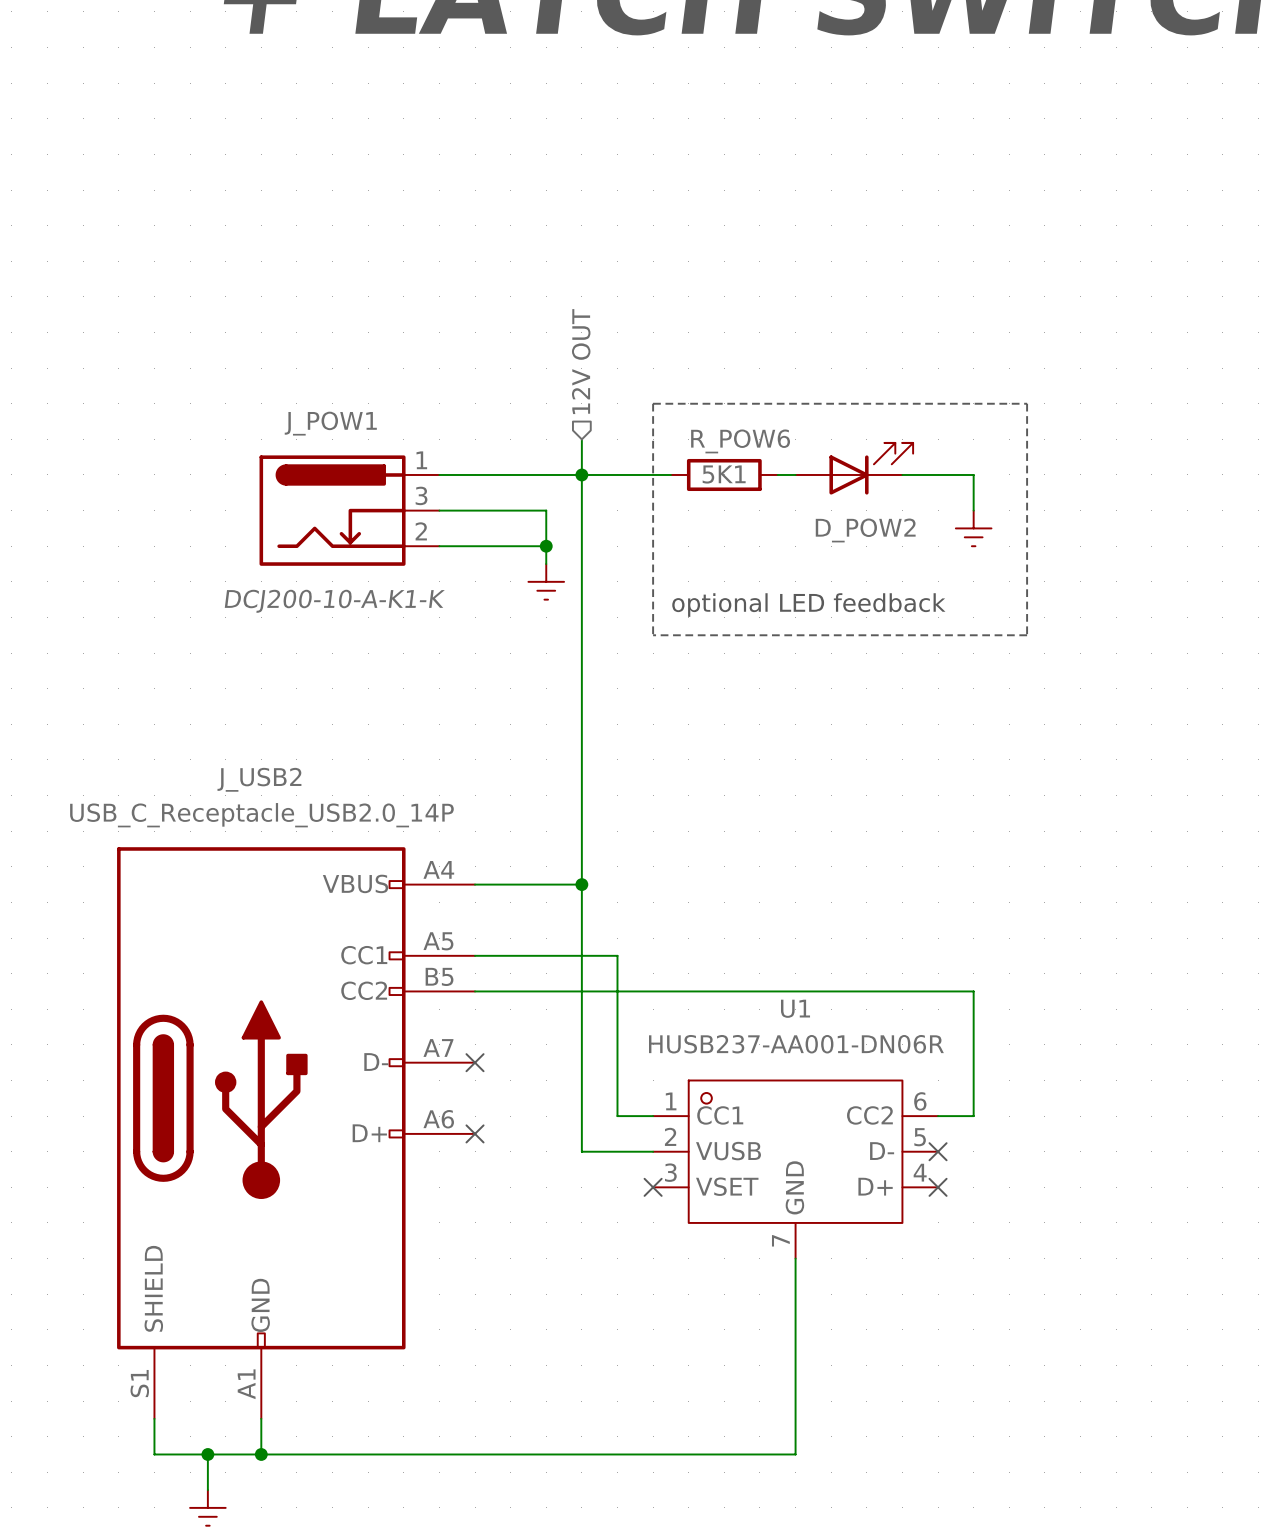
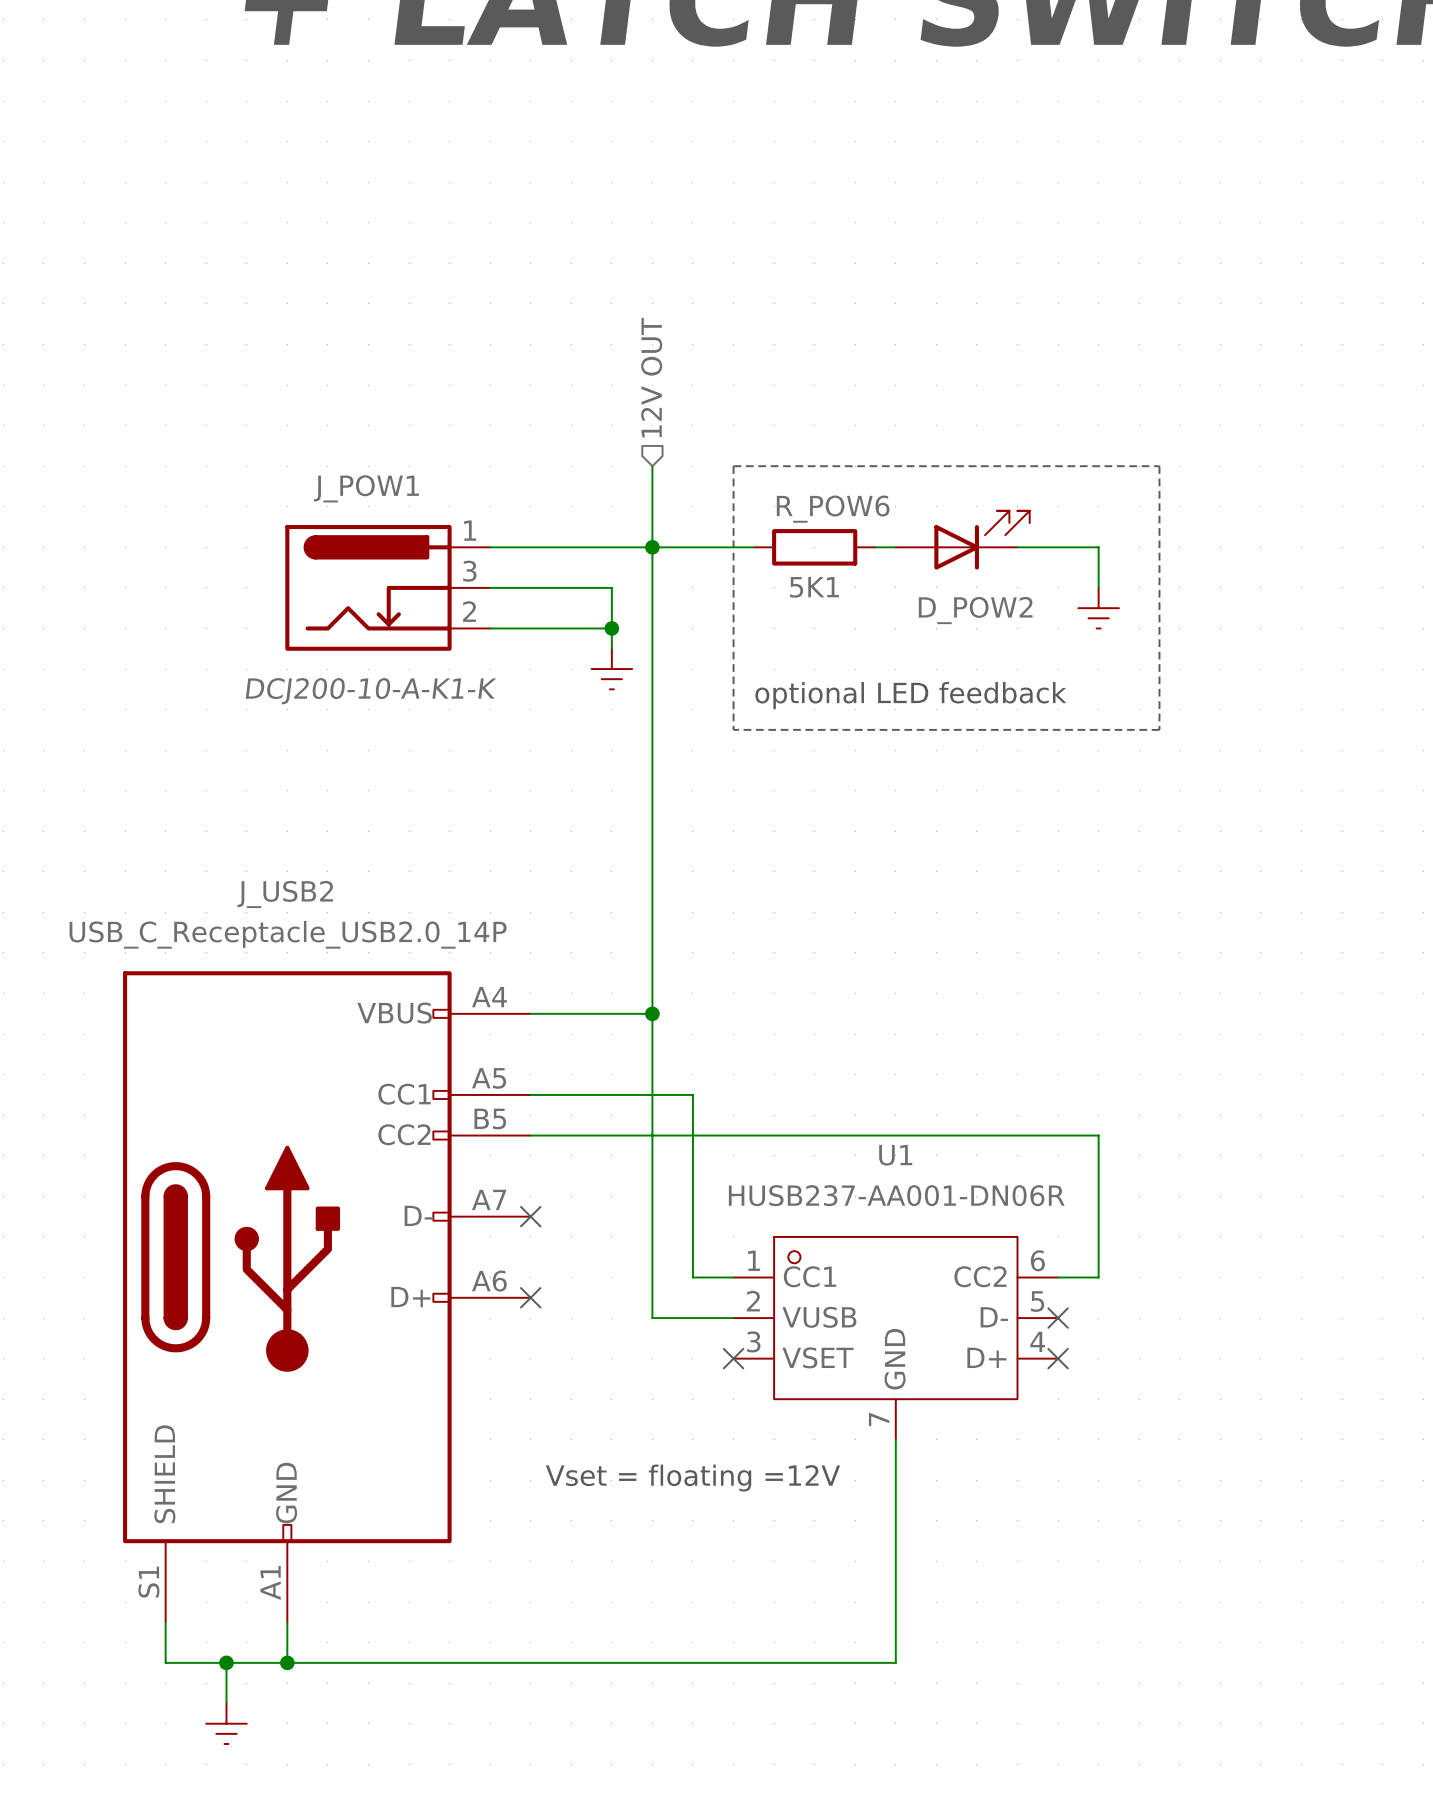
hierarchical label position: 12V OUT (581, 361) -> 12V OUT (651, 377)
wire: none -> (652, 466) (652, 506)
R_POW6 value position: 5K1 (724, 474) -> 5K1 (814, 587)
text: none -> Vset = floating =12V (692, 1478)

